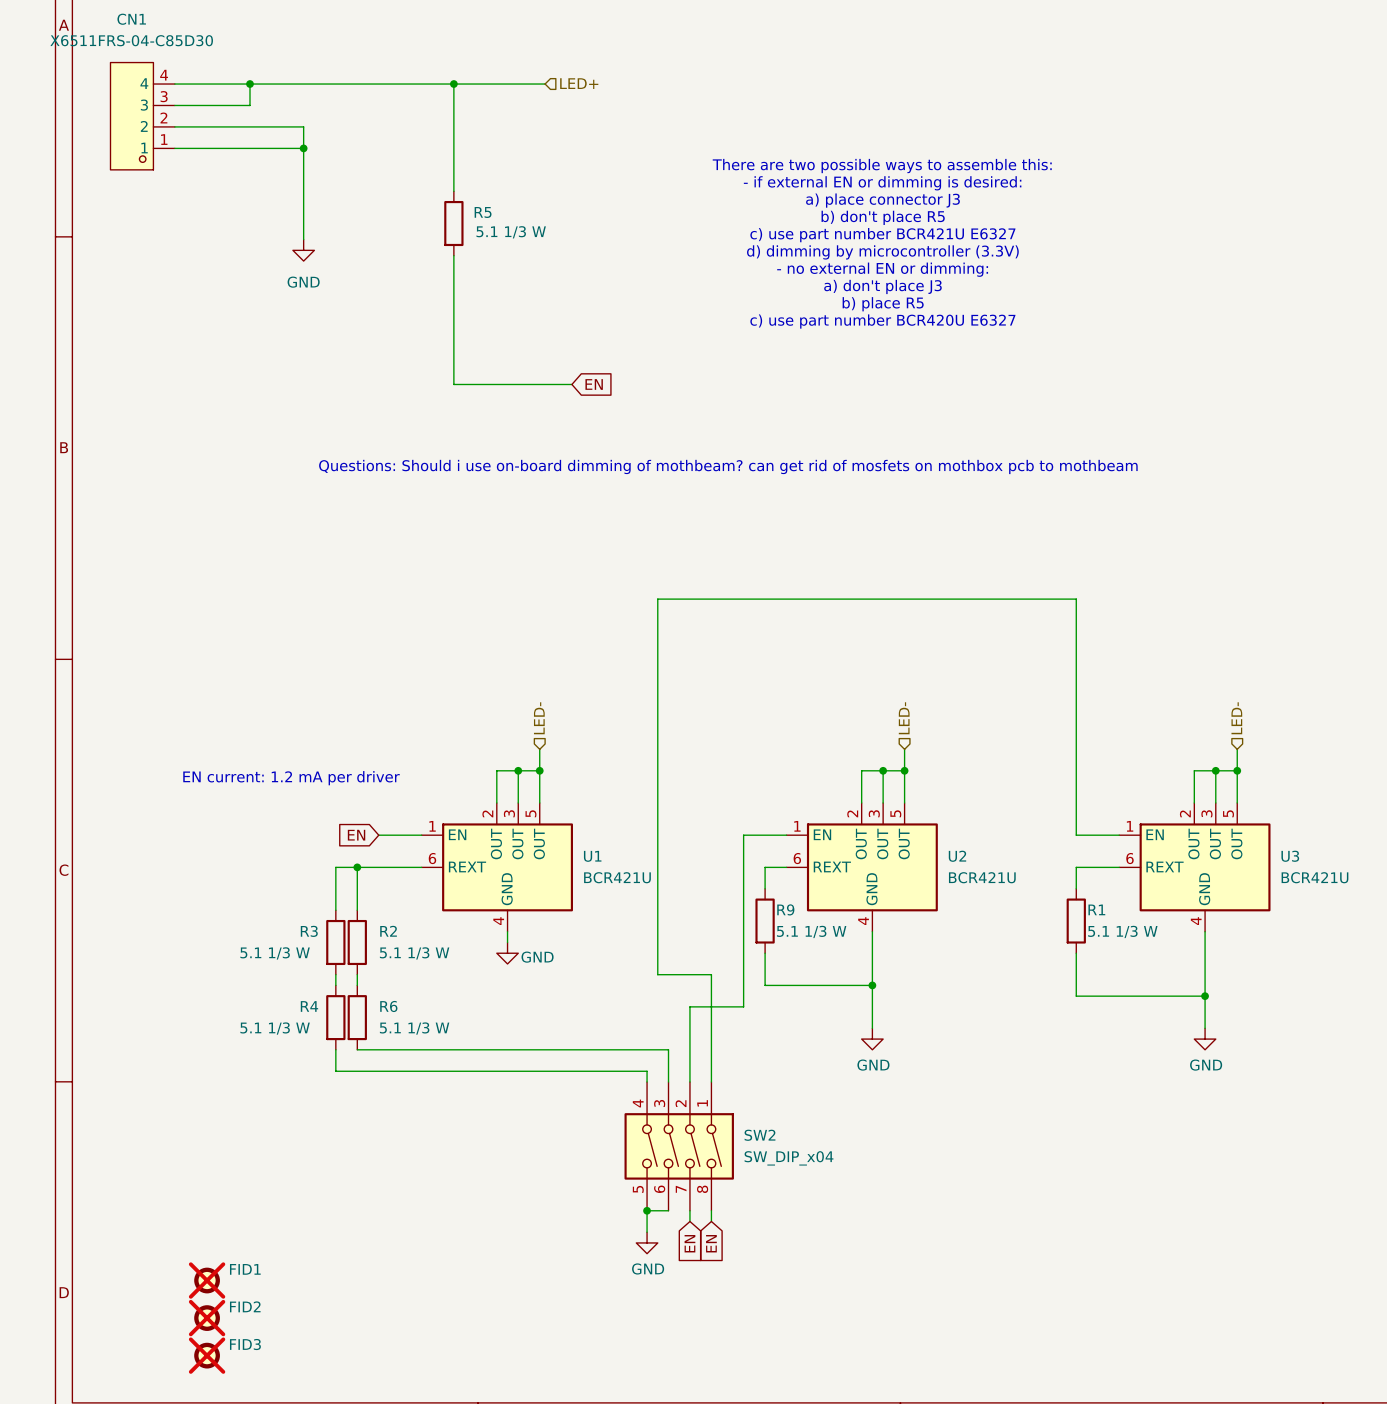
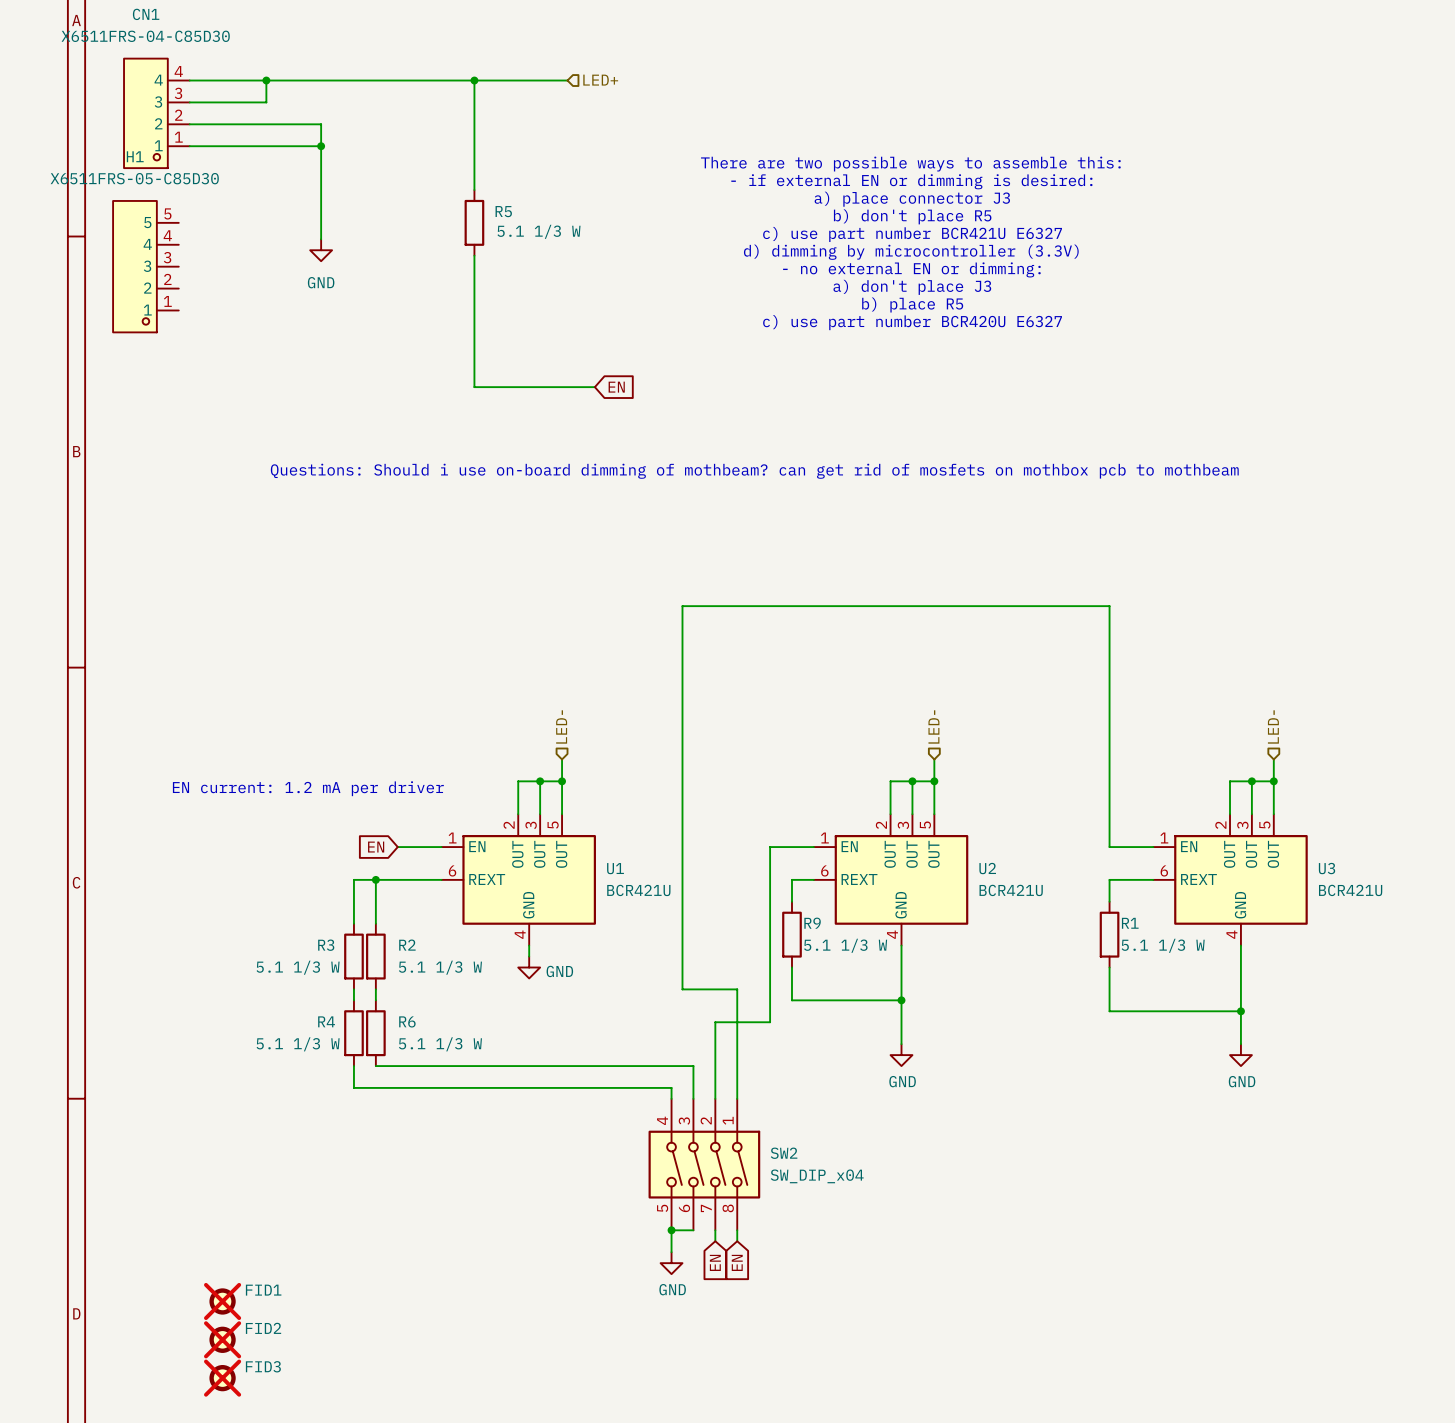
H1: none -> X6511FRS-05-C85D30 (145, 266)

